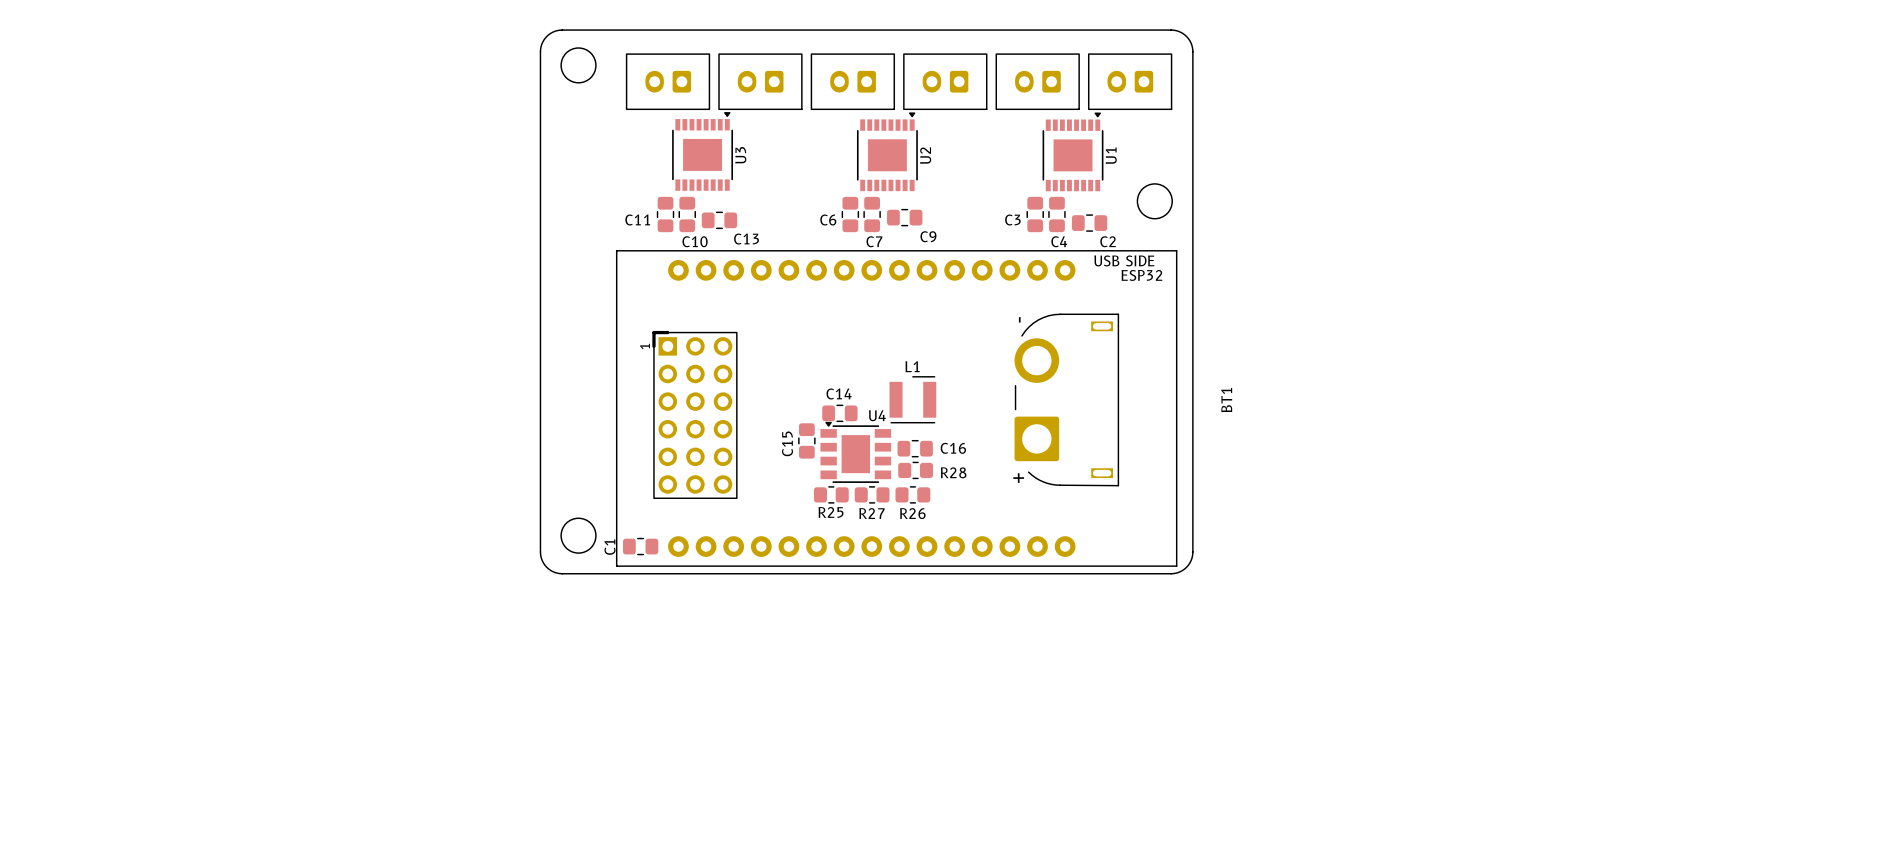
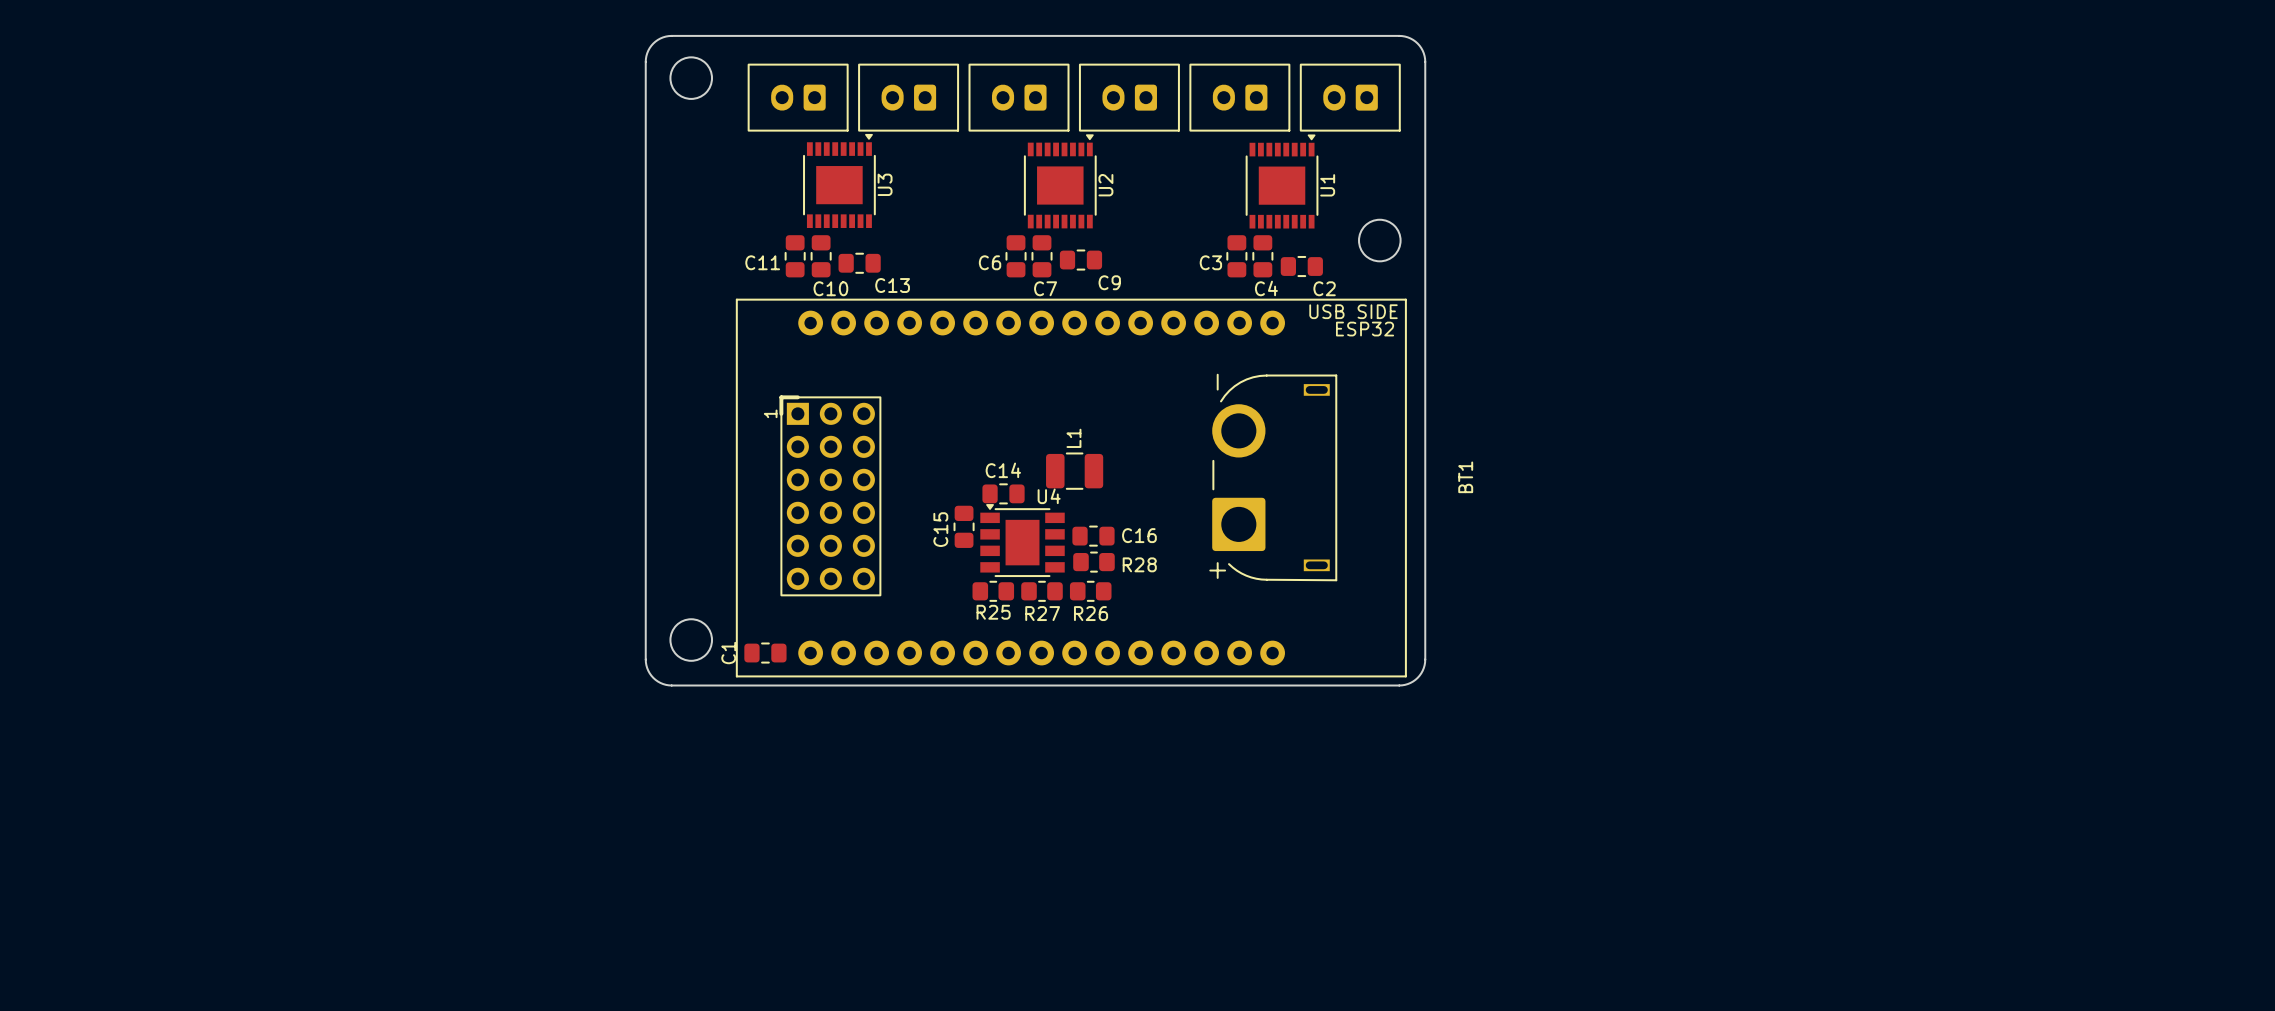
L1 footprint: [889, 376, 937, 424] -> [1046, 452, 1104, 490]

